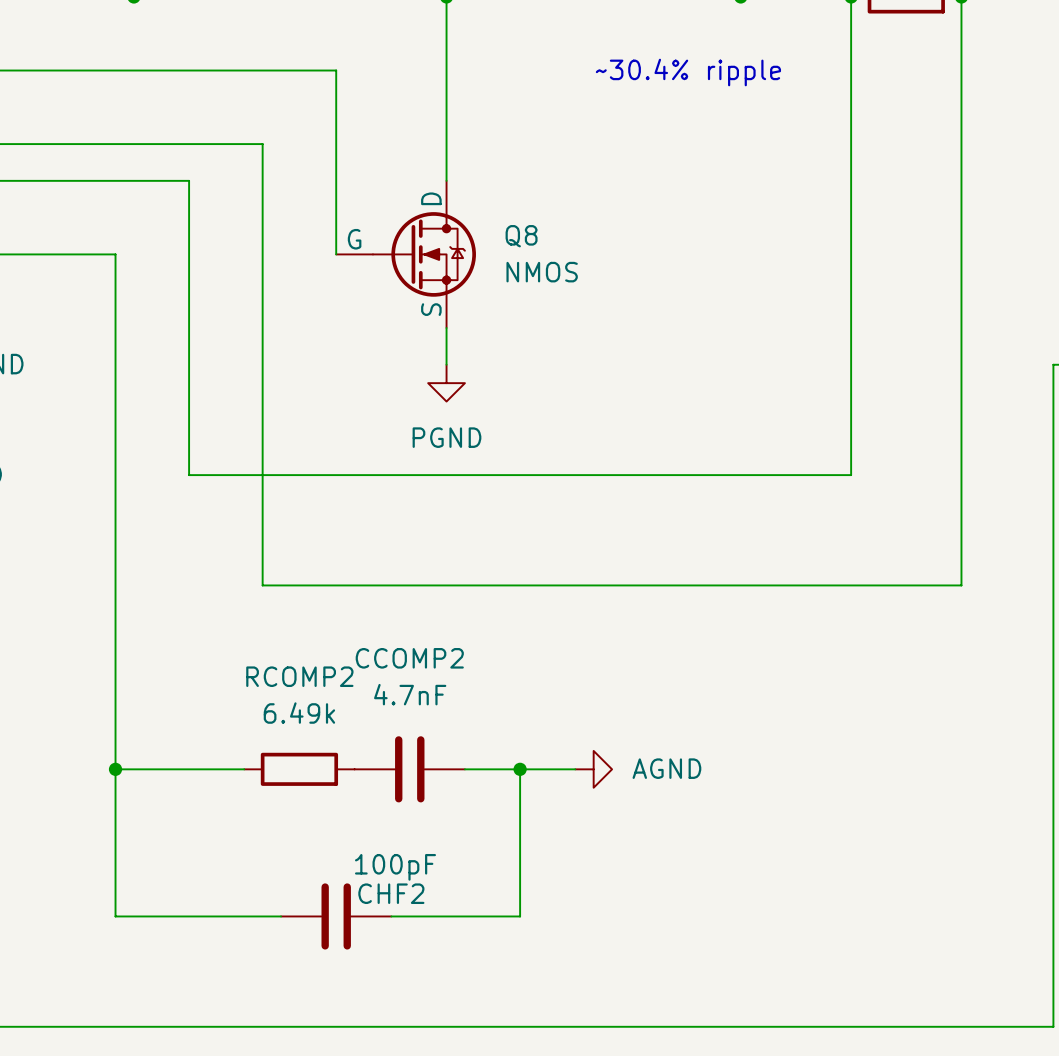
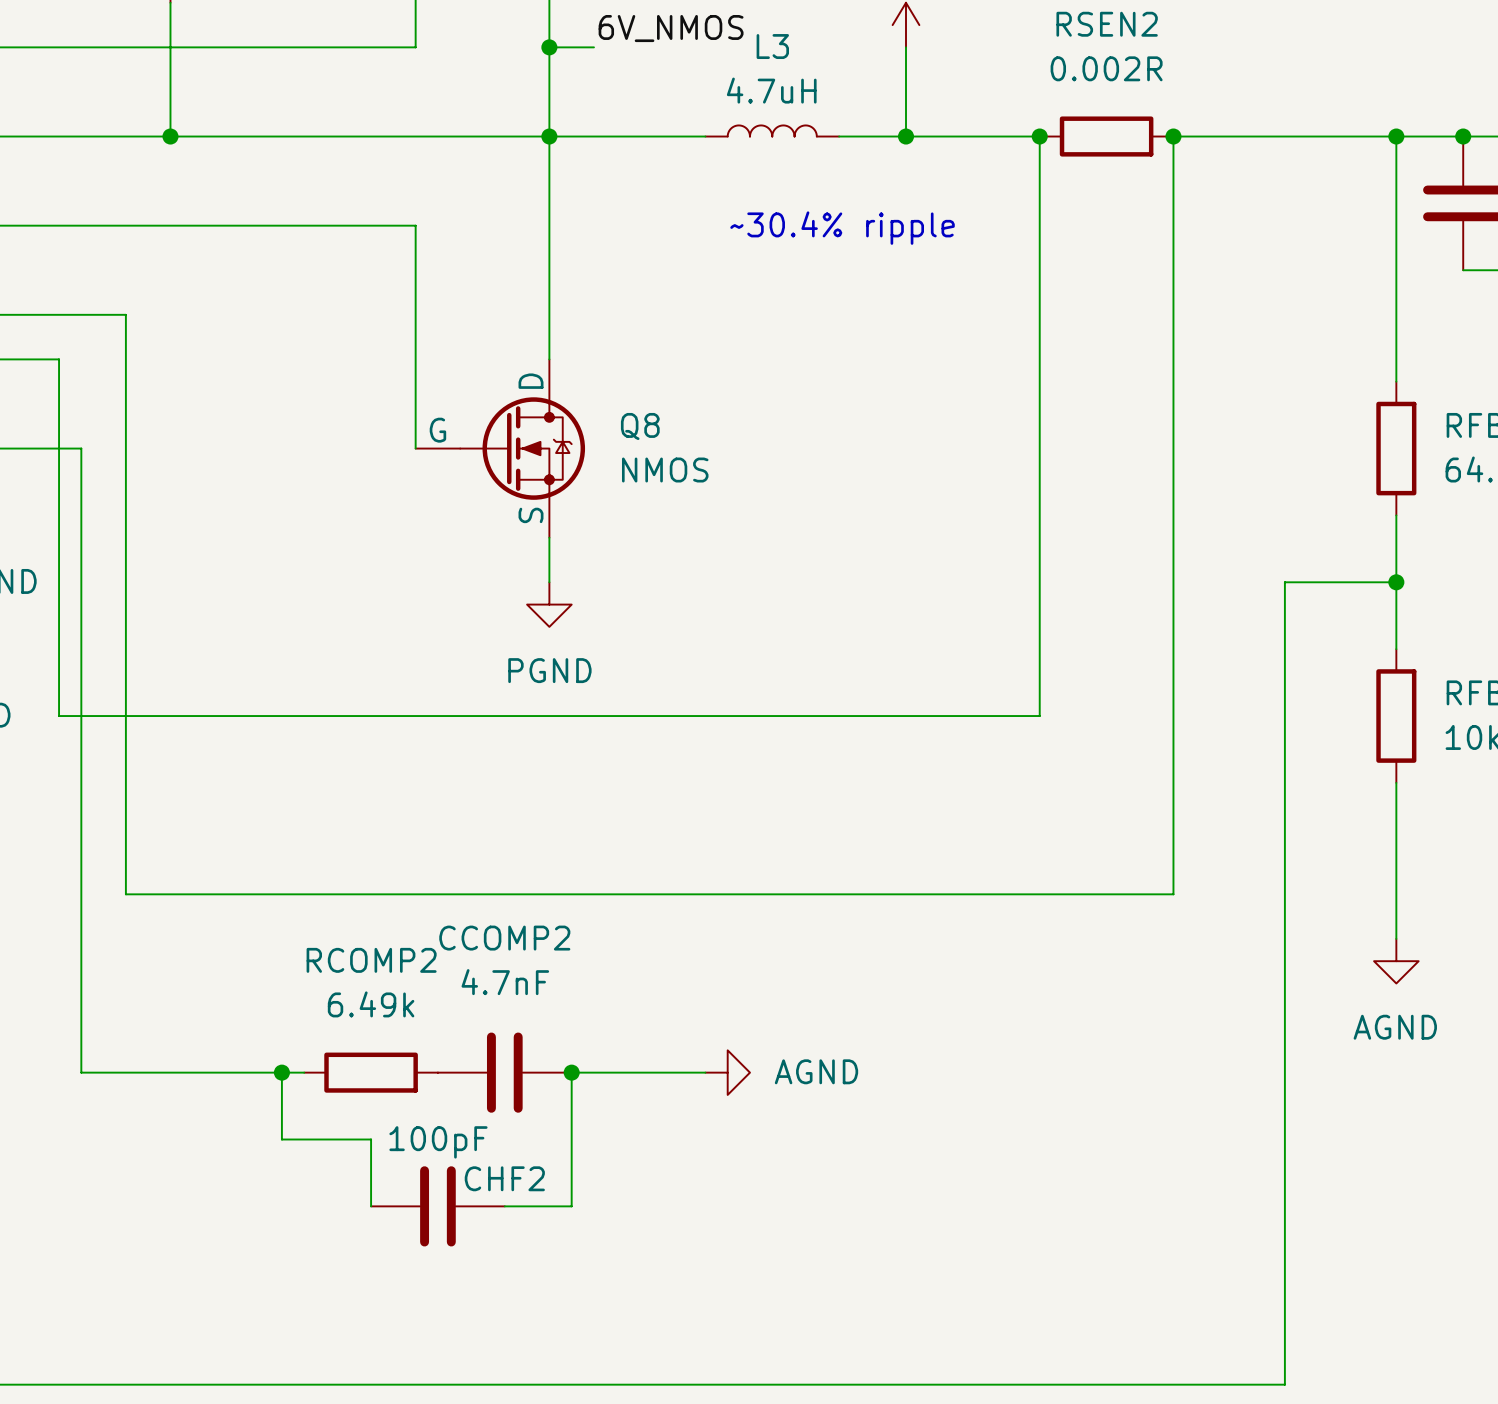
wire: (97, 144) (262, 144) (262, 585) (961, 585) -> (125, 314) (125, 894) (1173, 894) (1173, 849)
wire: (41, 180) (189, 180) (189, 475) -> (59, 359) (59, 716) (237, 716)
wire: (60, 254) (115, 254) (115, 916) (281, 916) -> (81, 448) (81, 1072) (148, 1072)
junction: (115, 769) -> none
wire: none -> (281, 1072) (281, 1139) (371, 1139) (371, 1206)
junction: none -> (281, 1072)
wire: none -> (571, 1072) (571, 1206) (504, 1206)
wire: (520, 769) (520, 916) (391, 916) -> none
junction position: (520, 769) -> (571, 1072)
CHF2 value position: 100pF (395, 867) -> 100pF (438, 1142)
CHF2 position: (336, 916) -> (437, 1206)

